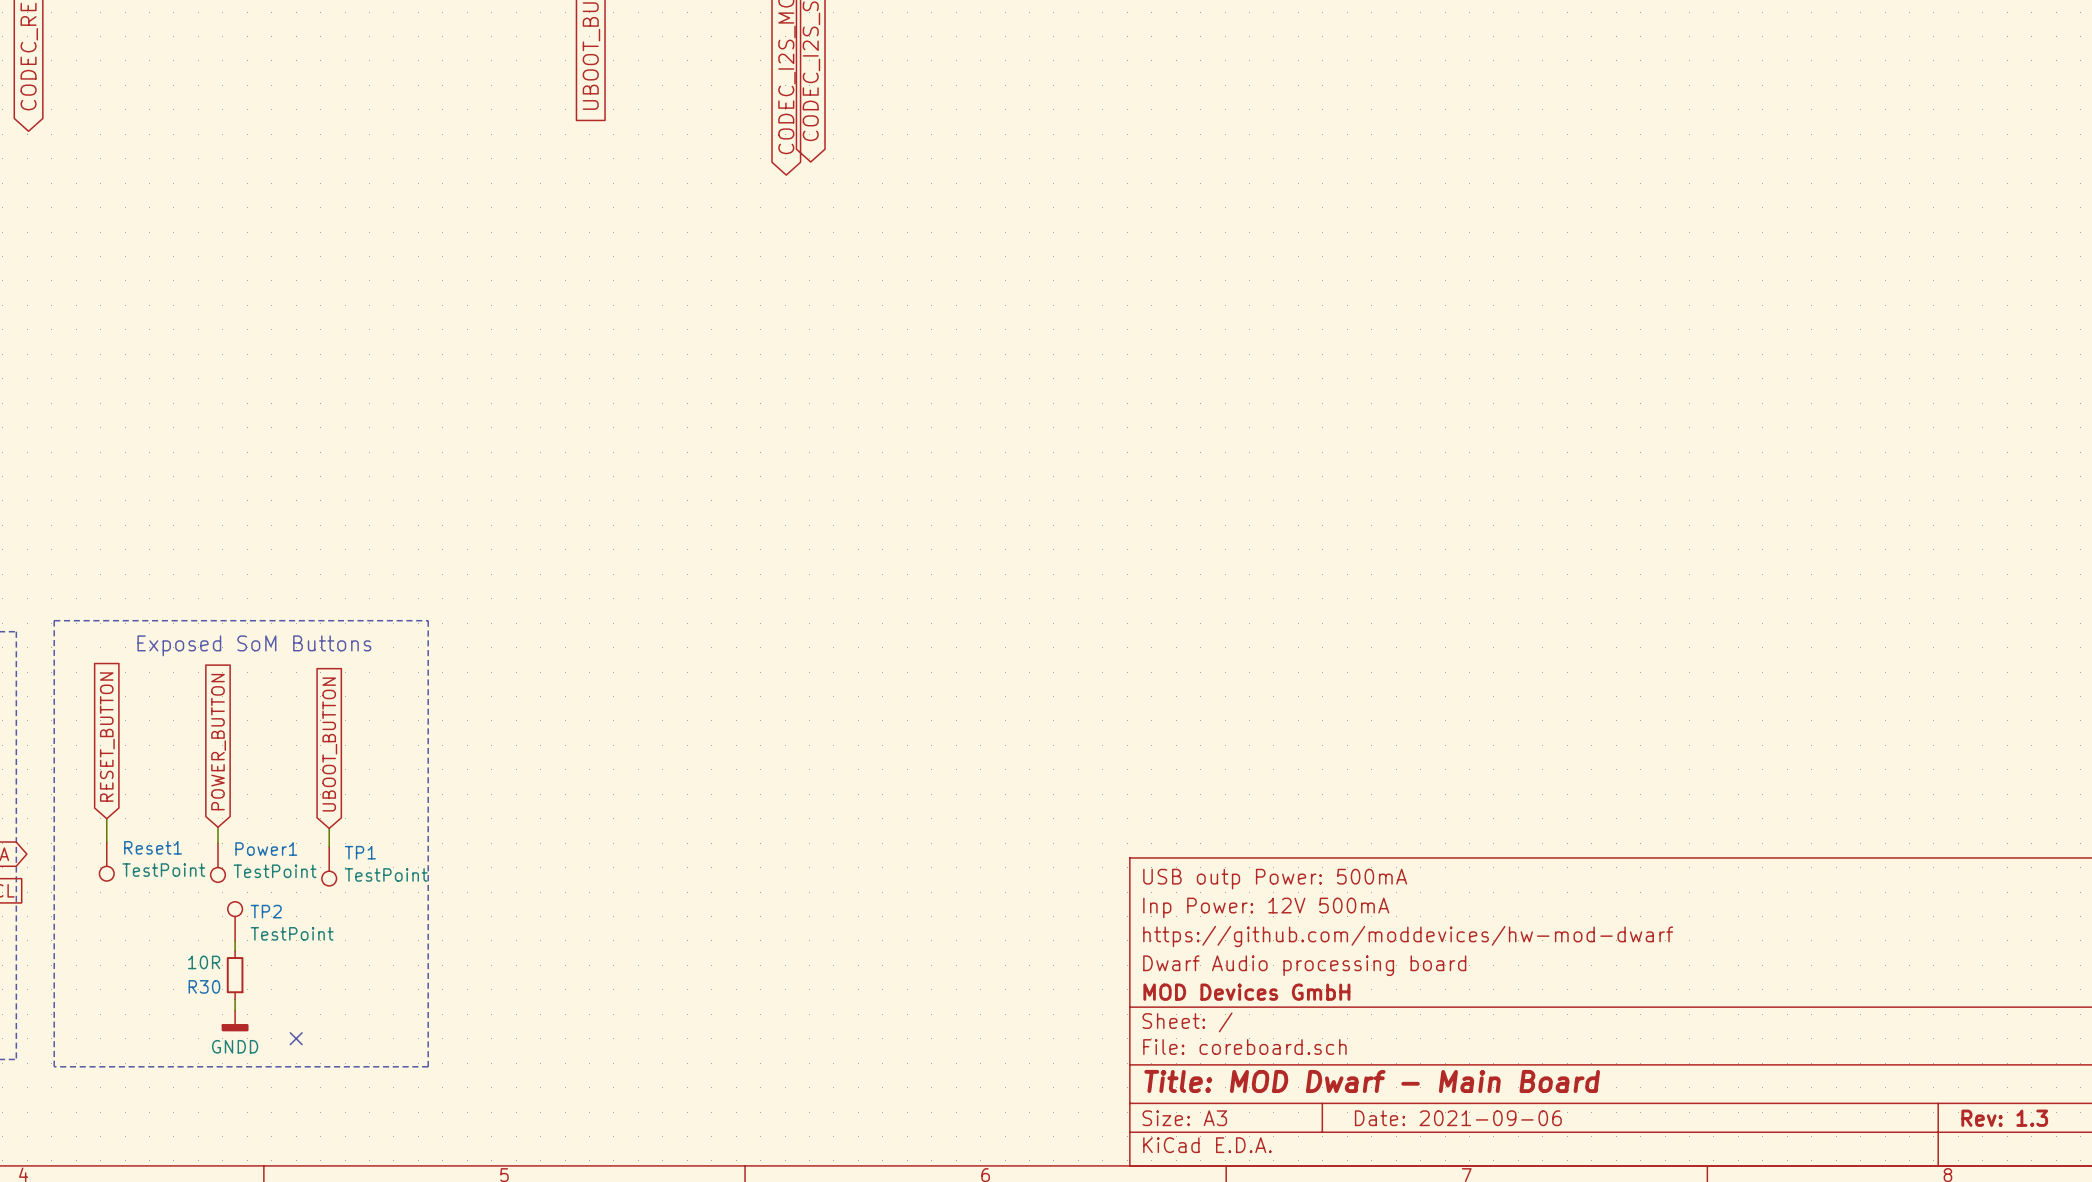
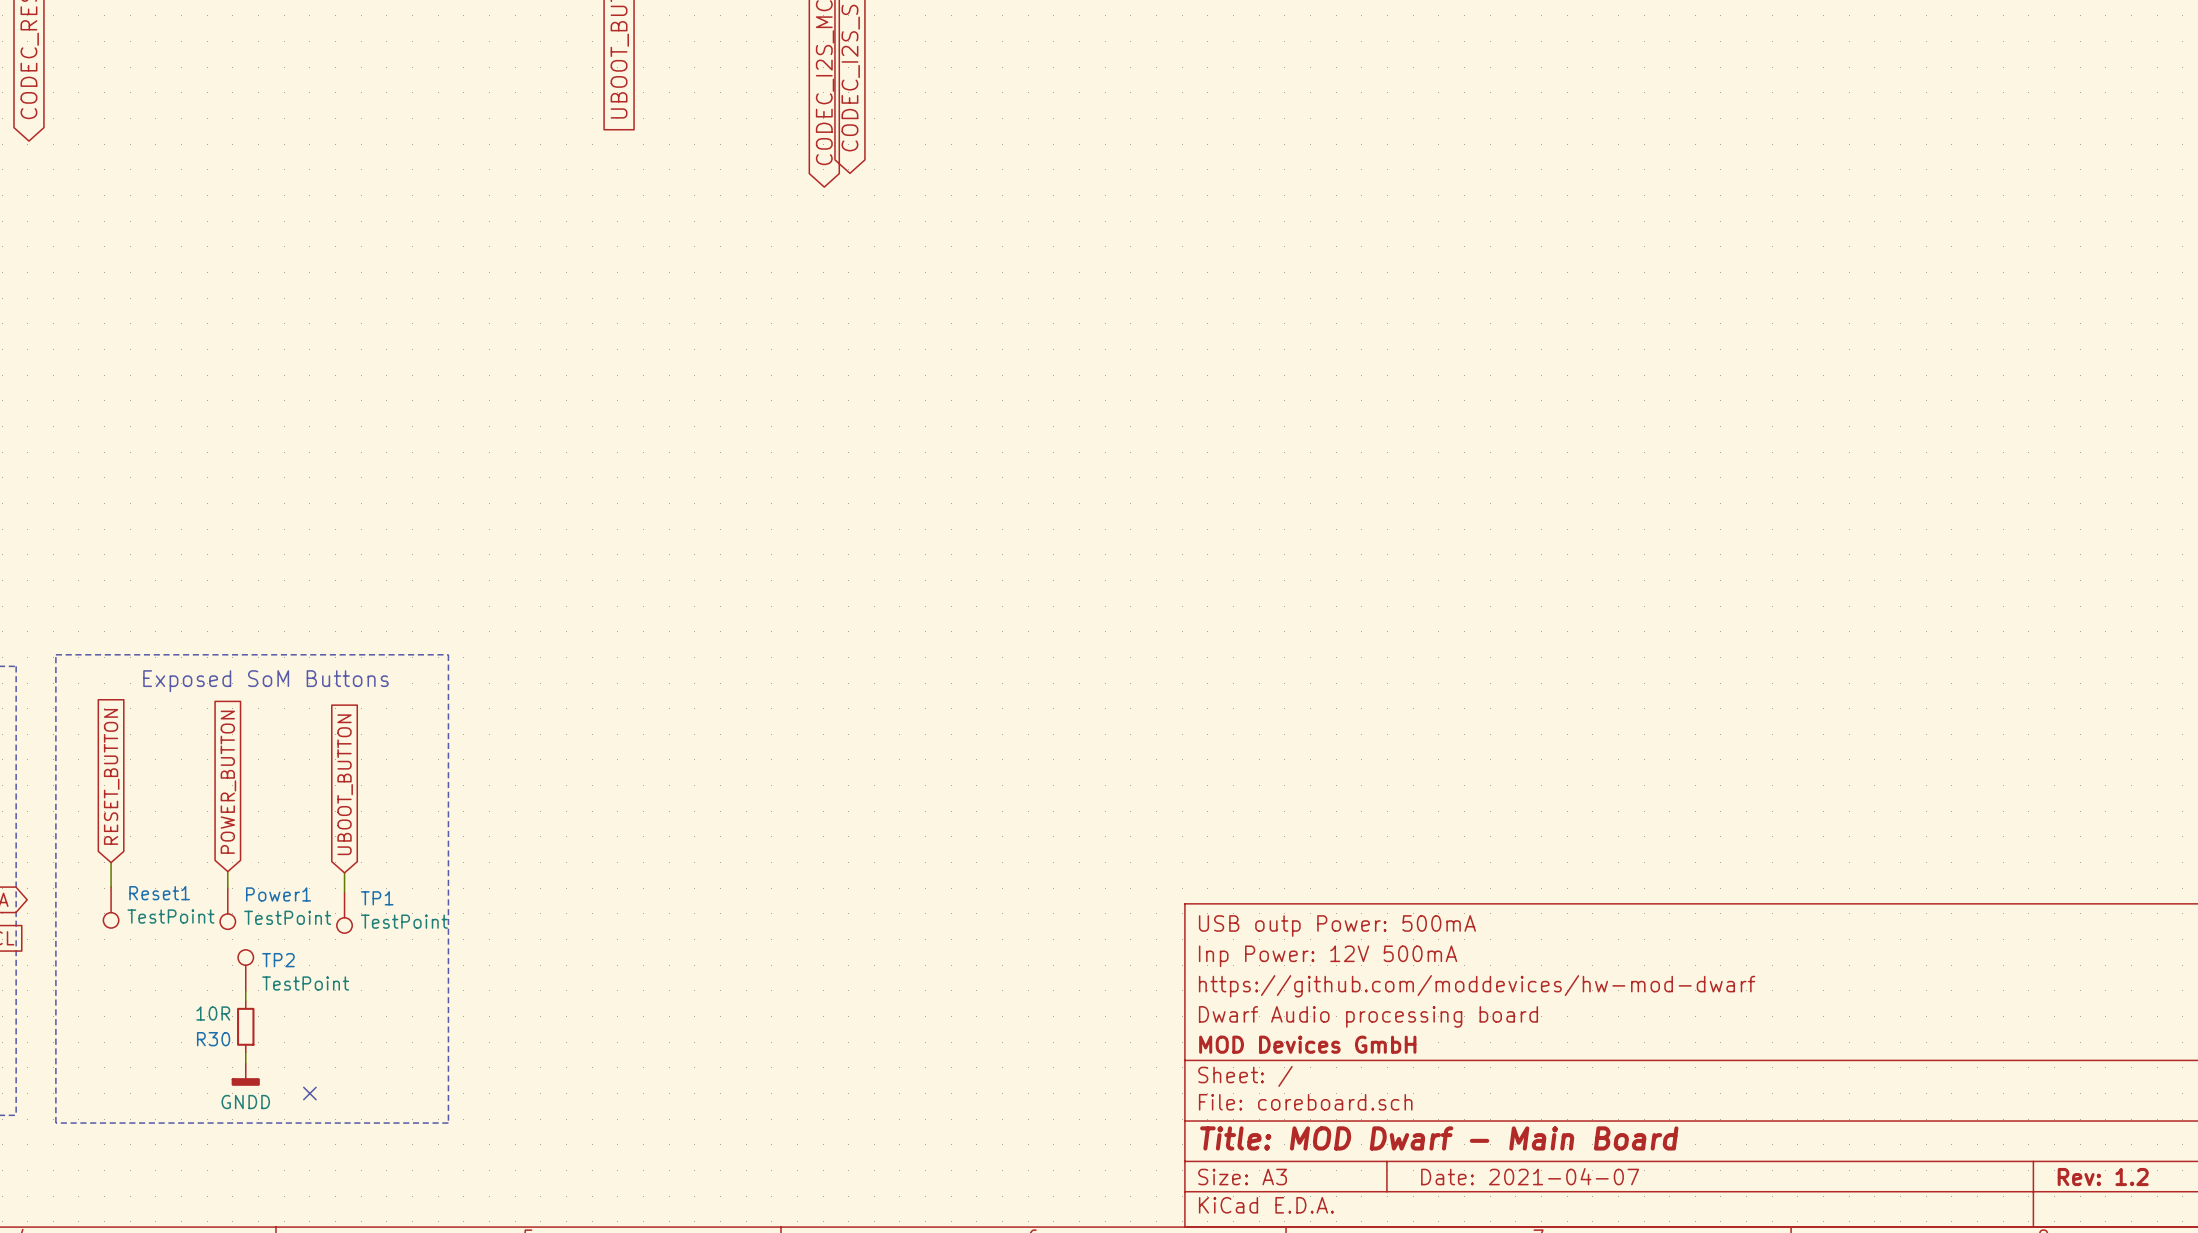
title block: Date: 2021-09-06 (1458, 1118) -> Date: 2021-04-07 (1530, 1176)
title block: Rev: 1.3 (2004, 1118) -> Rev: 1.2 (2103, 1177)

